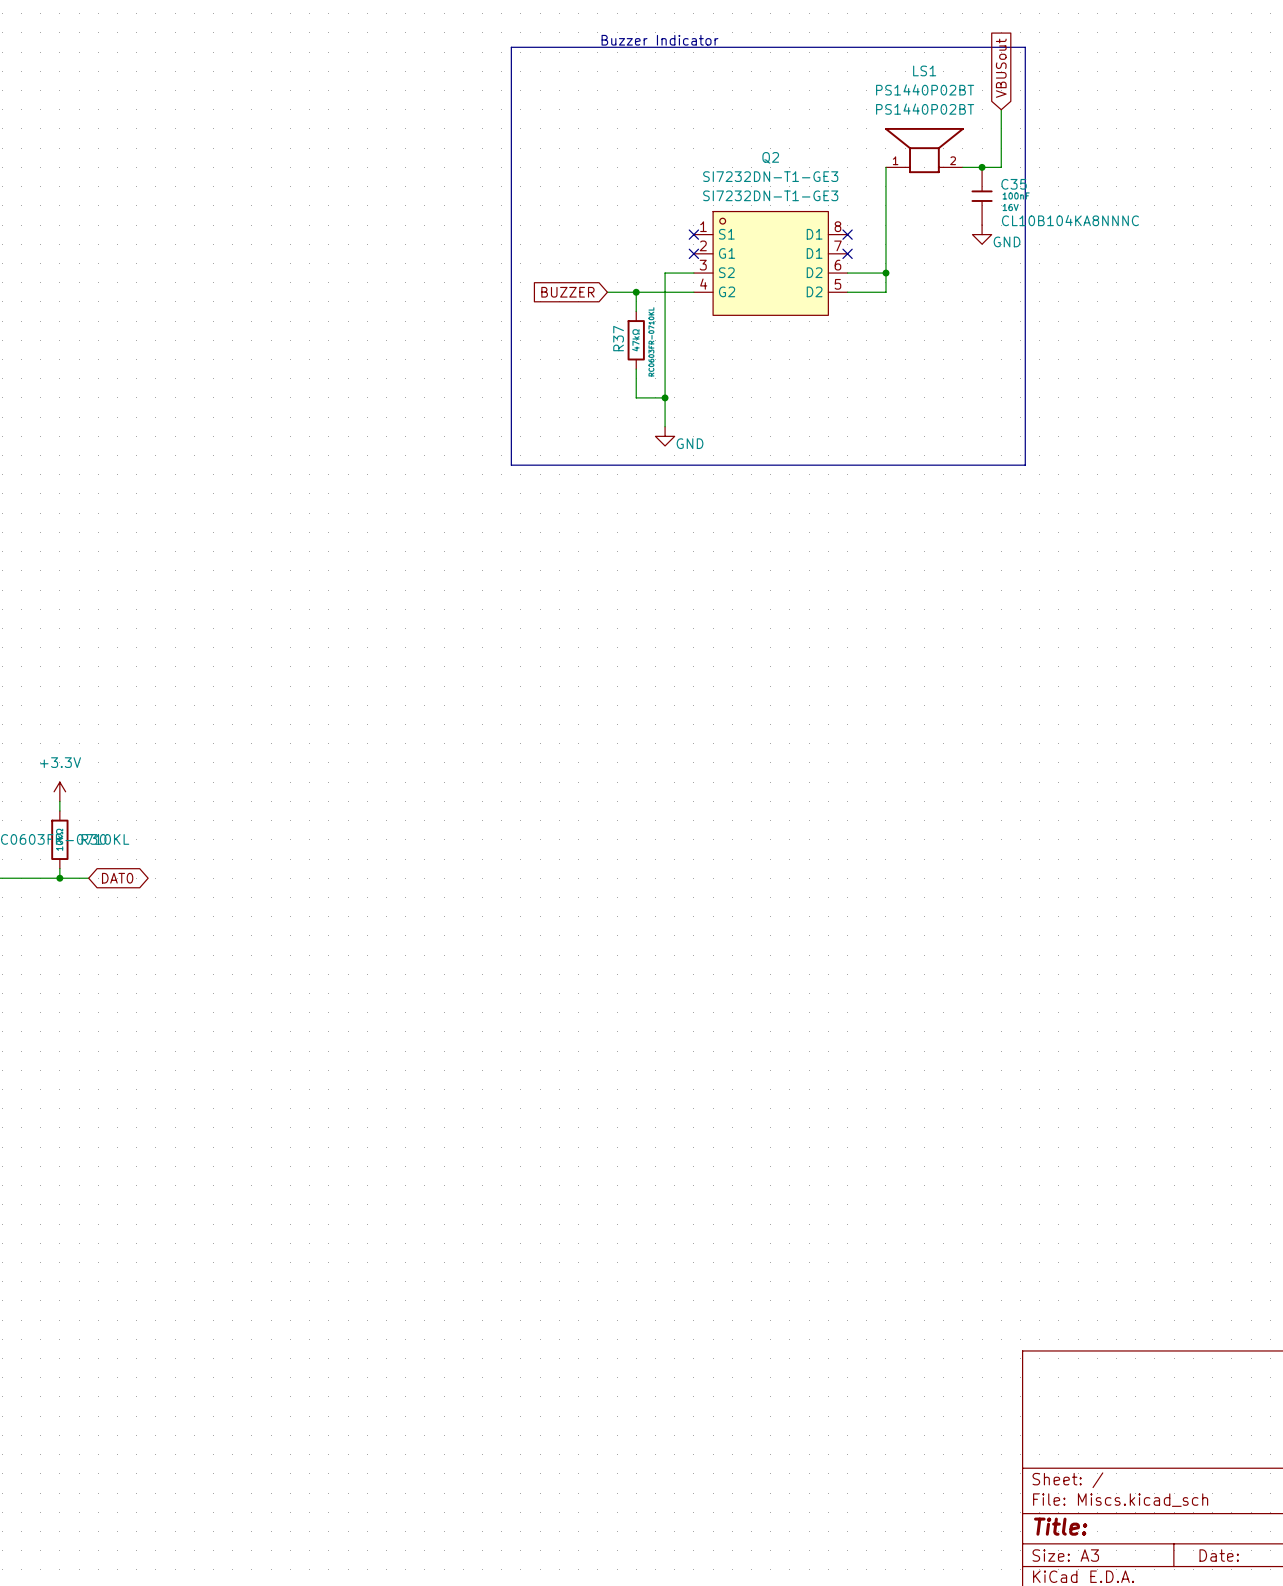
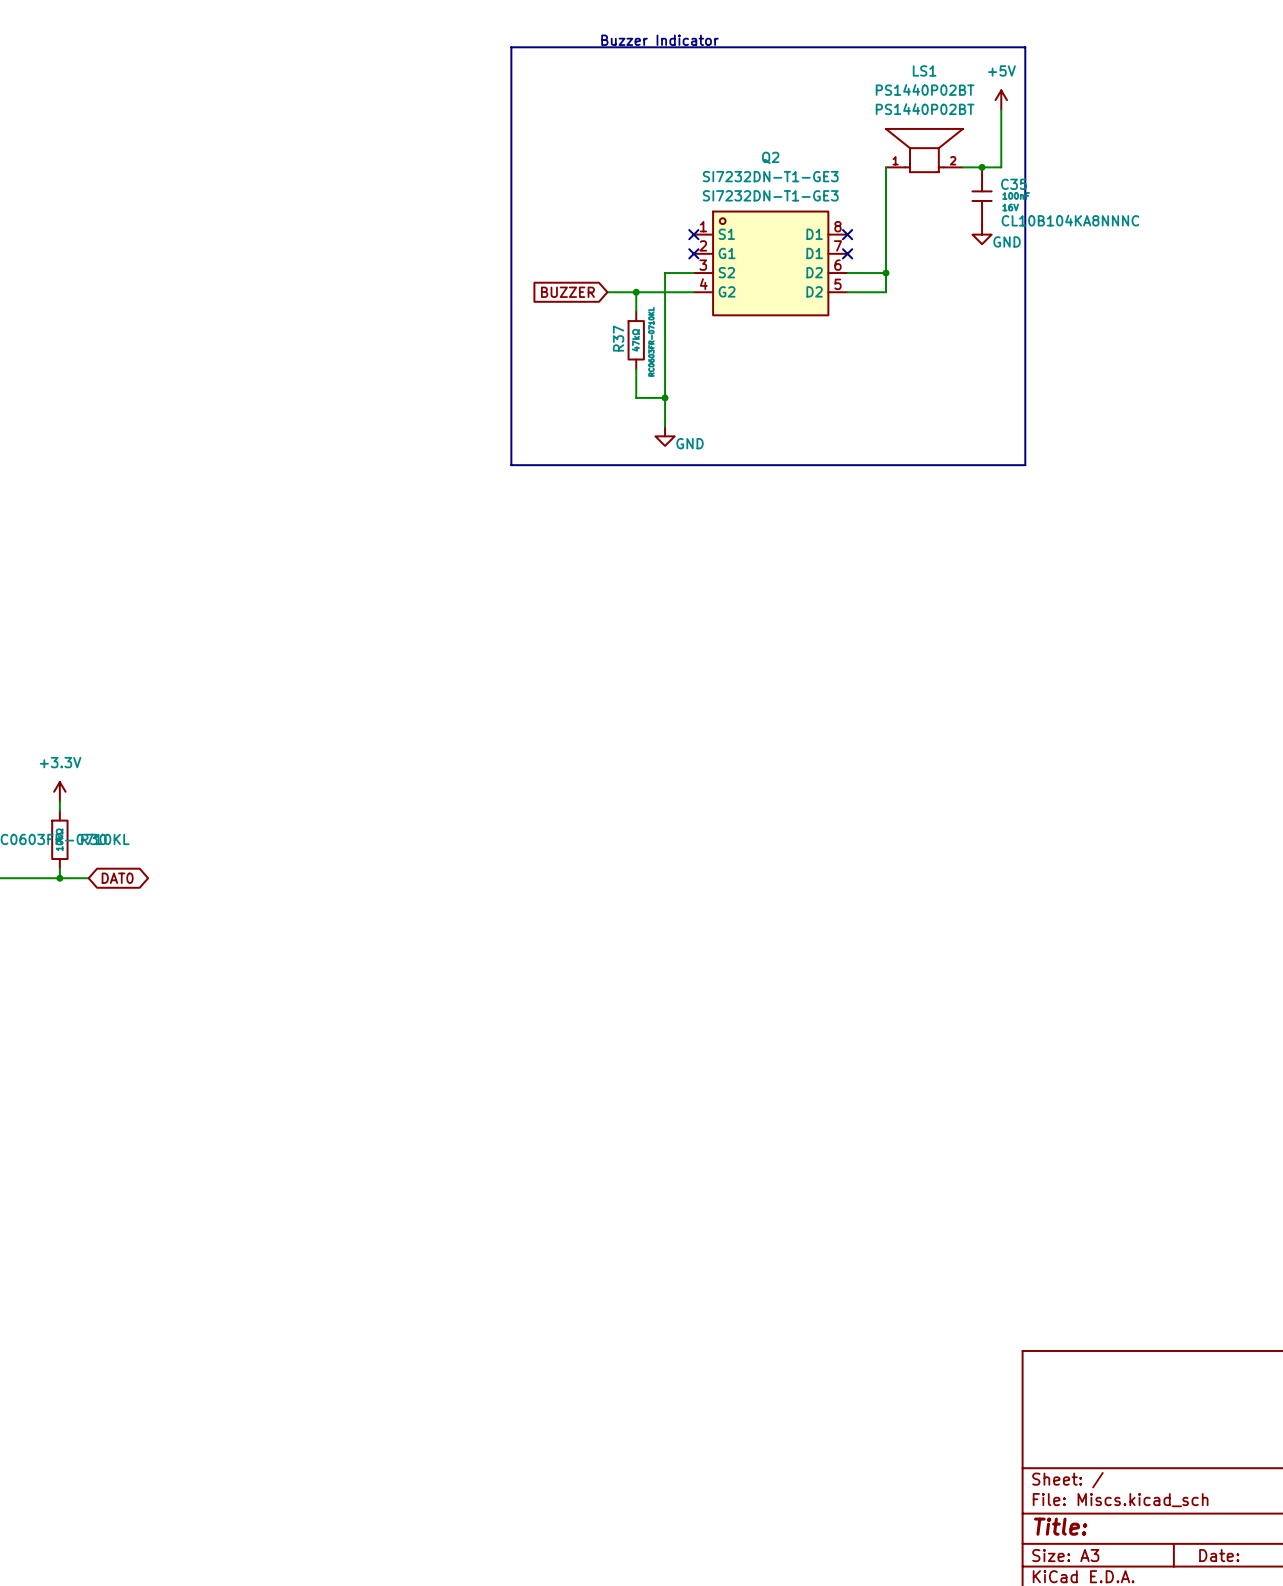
global label: VBUSout (1001, 68) -> none
power symbol: none -> +5V (1001, 100)

